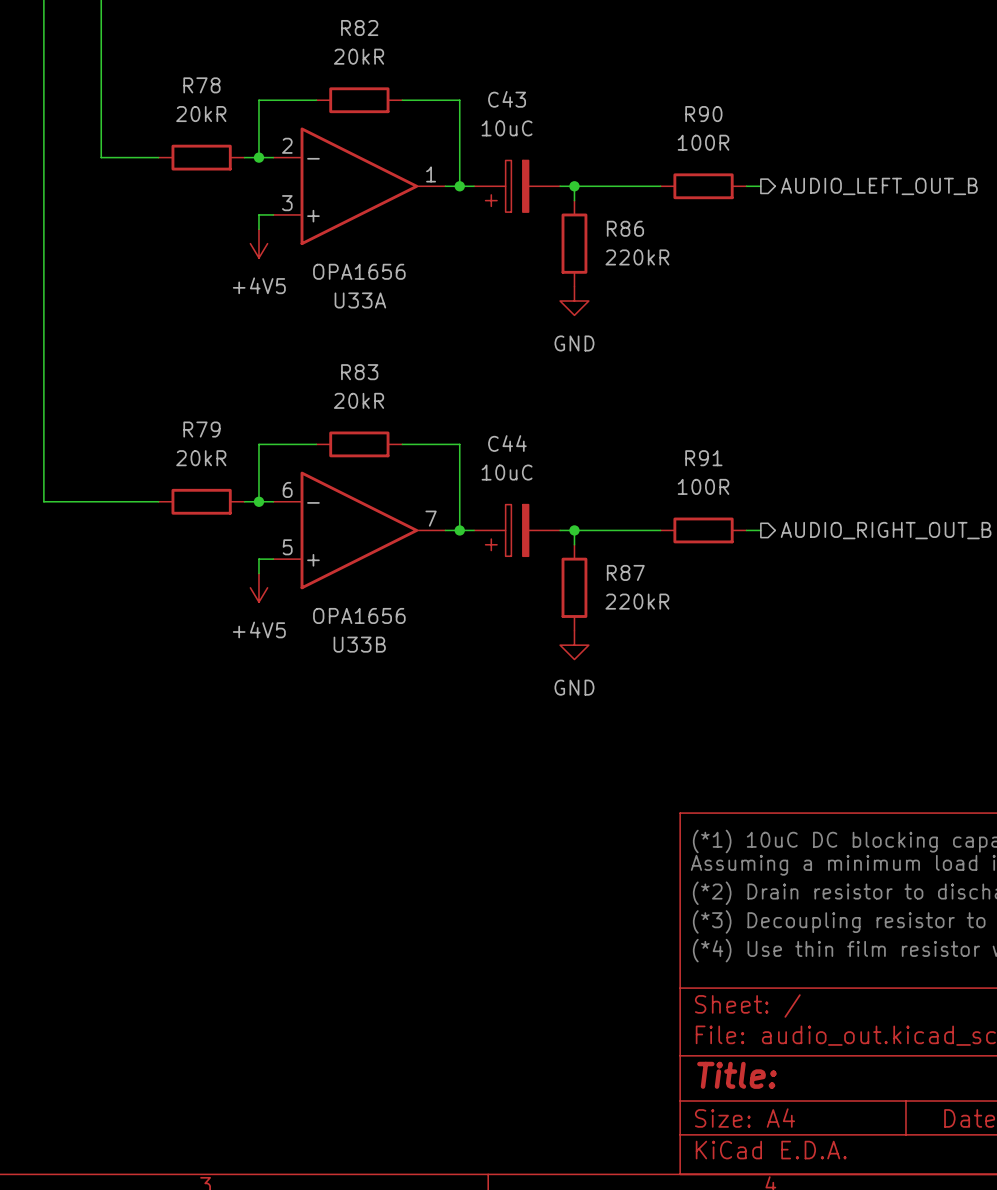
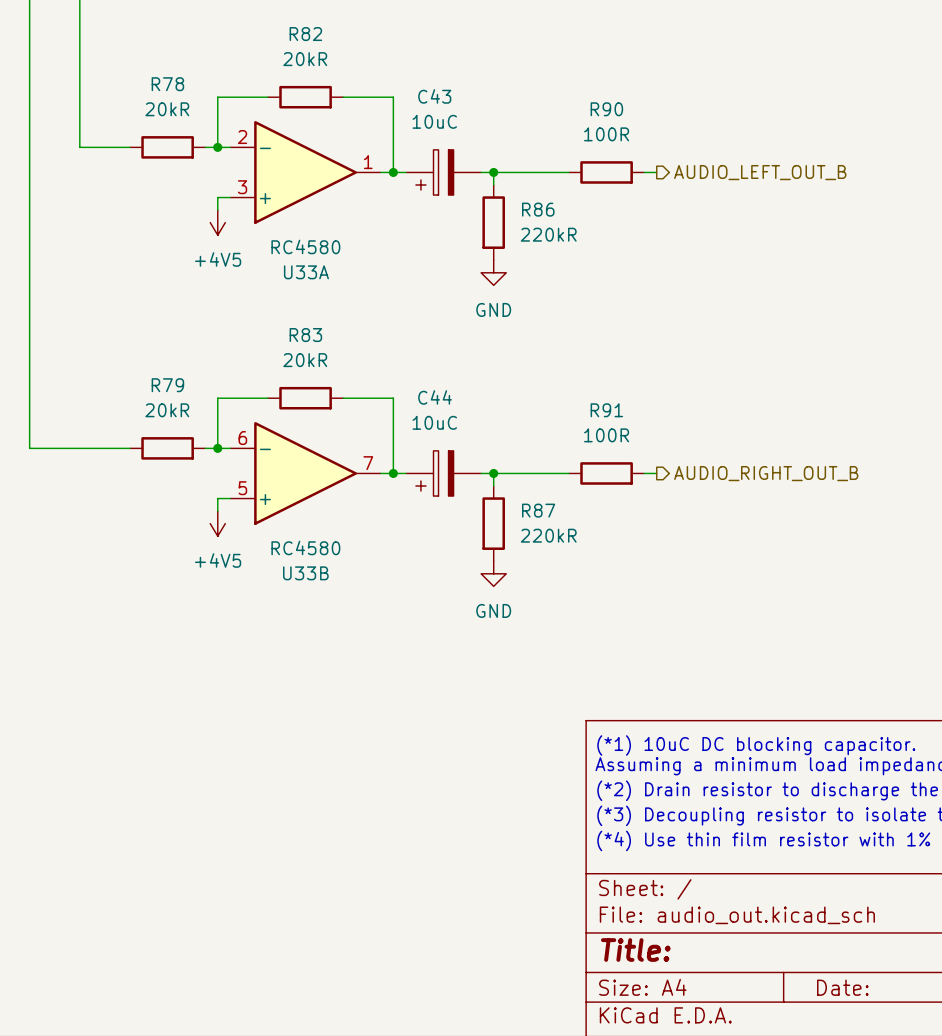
U33A value: OPA1656 (359, 271) -> RC4580 (305, 246)
U33B value: OPA1656 (359, 615) -> RC4580 (305, 547)

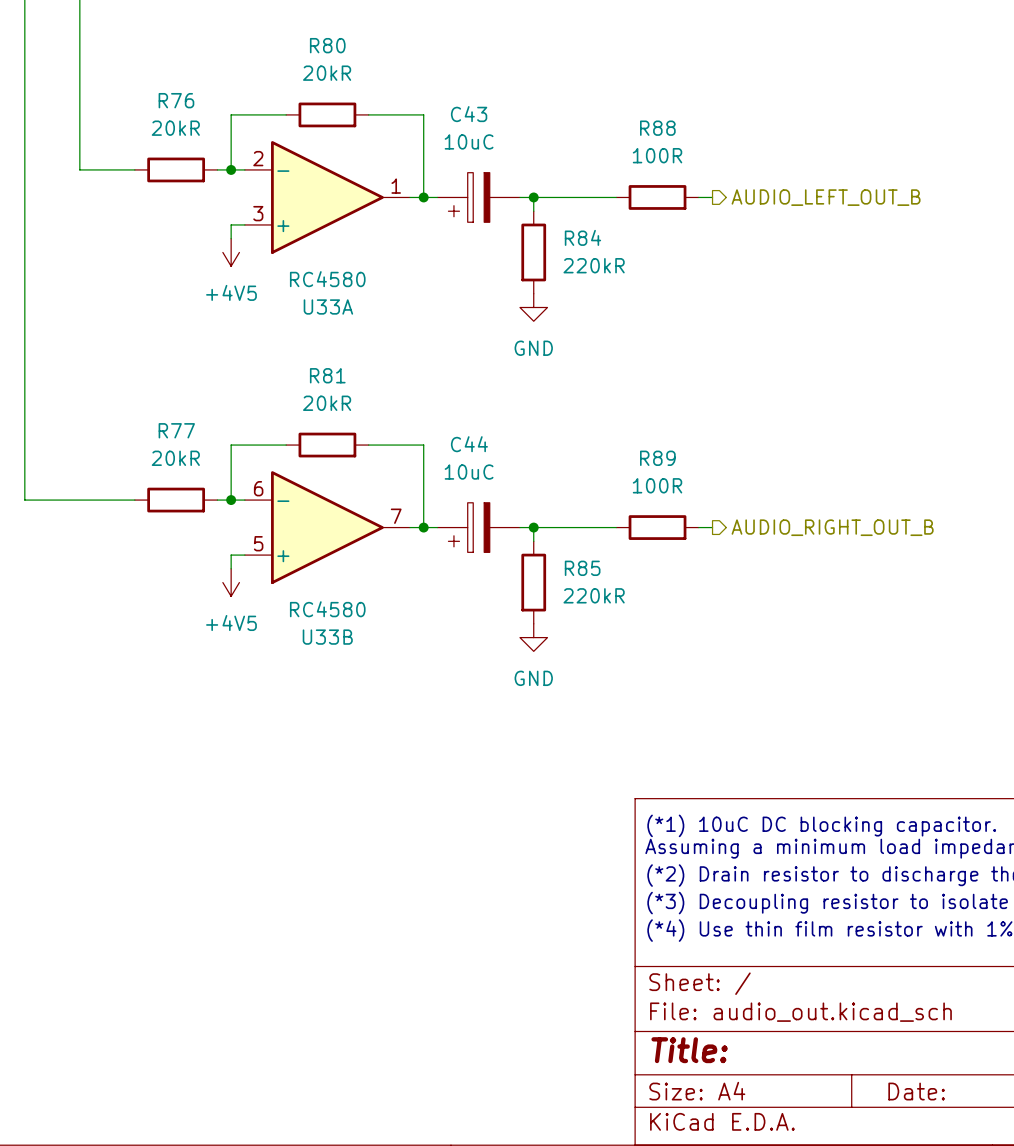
R82 name: R82 (305, 34) -> R80 (327, 45)
R78 name: R78 (167, 84) -> R76 (176, 100)
R90 name: R90 (606, 109) -> R88 (657, 128)
R86 name: R86 (538, 209) -> R84 (582, 237)
R83 name: R83 (305, 335) -> R81 (327, 375)
R79 name: R79 (167, 385) -> R77 (176, 430)
R91 name: R91 (606, 410) -> R89 (657, 458)
R87 name: R87 (538, 510) -> R85 (582, 568)

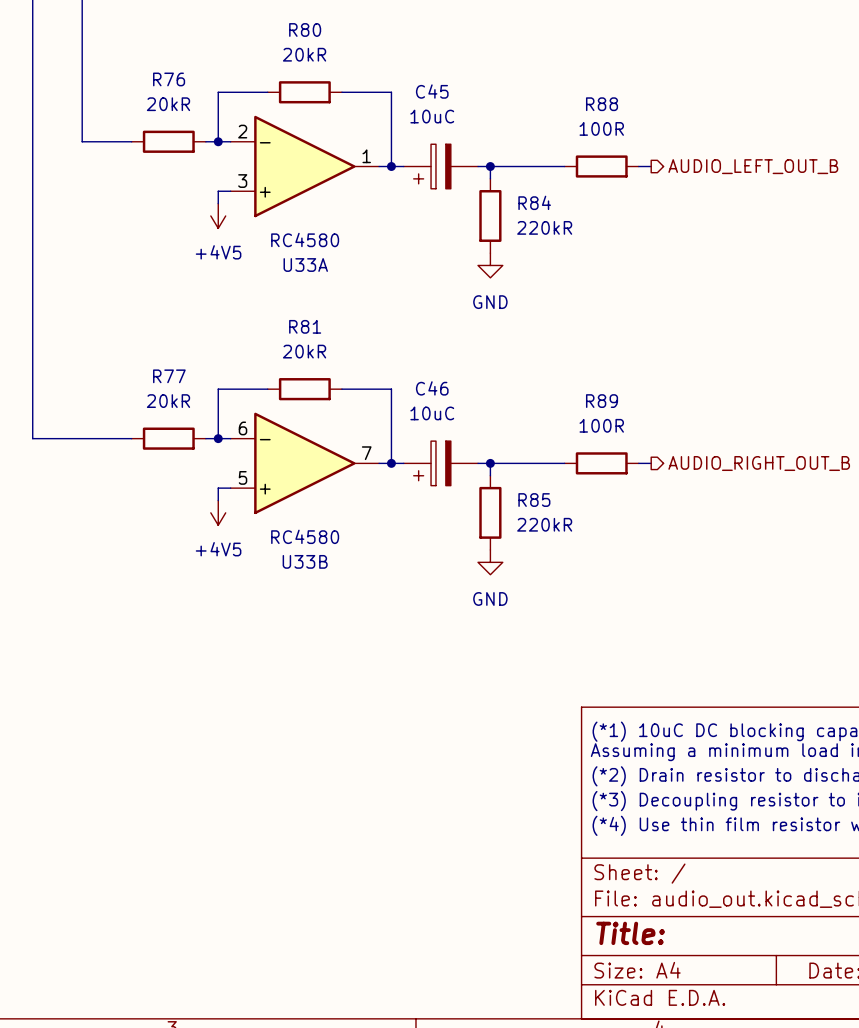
C43 name: C43 (469, 114) -> C45 (432, 91)
C44 name: C44 (469, 444) -> C46 (432, 388)

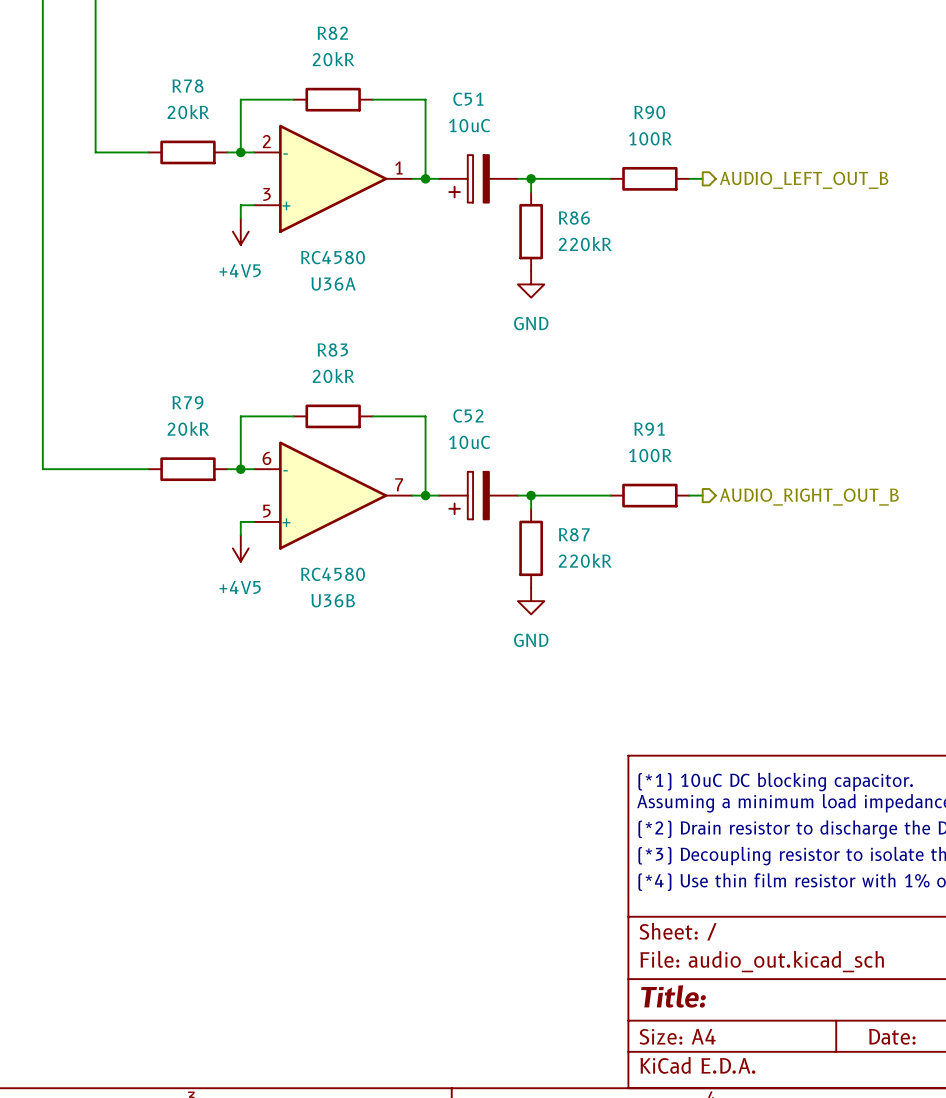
R80 name: R80 (305, 29) -> R82 (332, 33)
R76 name: R76 (169, 79) -> R78 (187, 86)
C45 name: C45 (432, 91) -> C51 (468, 99)
R88 name: R88 (602, 104) -> R90 (649, 112)
R84 name: R84 (534, 202) -> R86 (574, 218)
U33A name: U33A (305, 265) -> U36A (333, 284)
R81 name: R81 (305, 326) -> R83 (332, 350)
R77 name: R77 (169, 376) -> R79 (187, 402)
C46 name: C46 (432, 388) -> C52 (468, 415)
R89 name: R89 (602, 401) -> R91 (649, 429)
R85 name: R85 (534, 500) -> R87 (574, 534)
U33B name: U33B (305, 561) -> U36B (333, 600)

